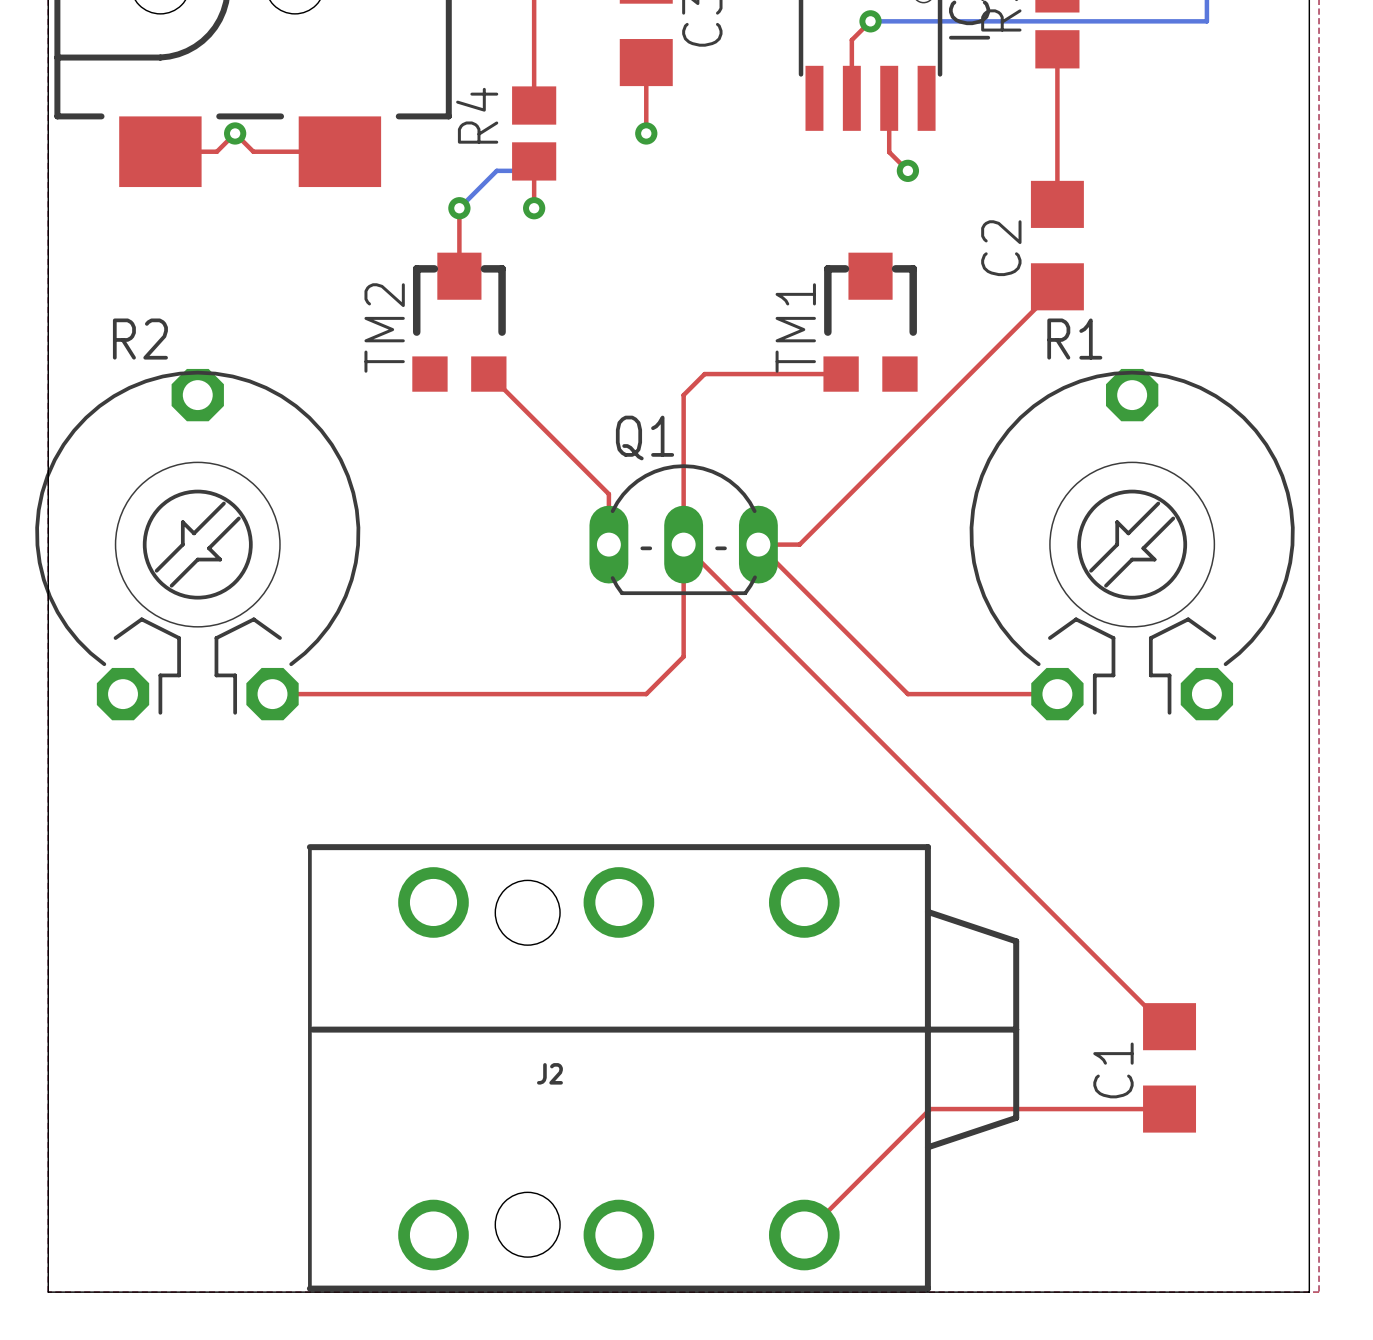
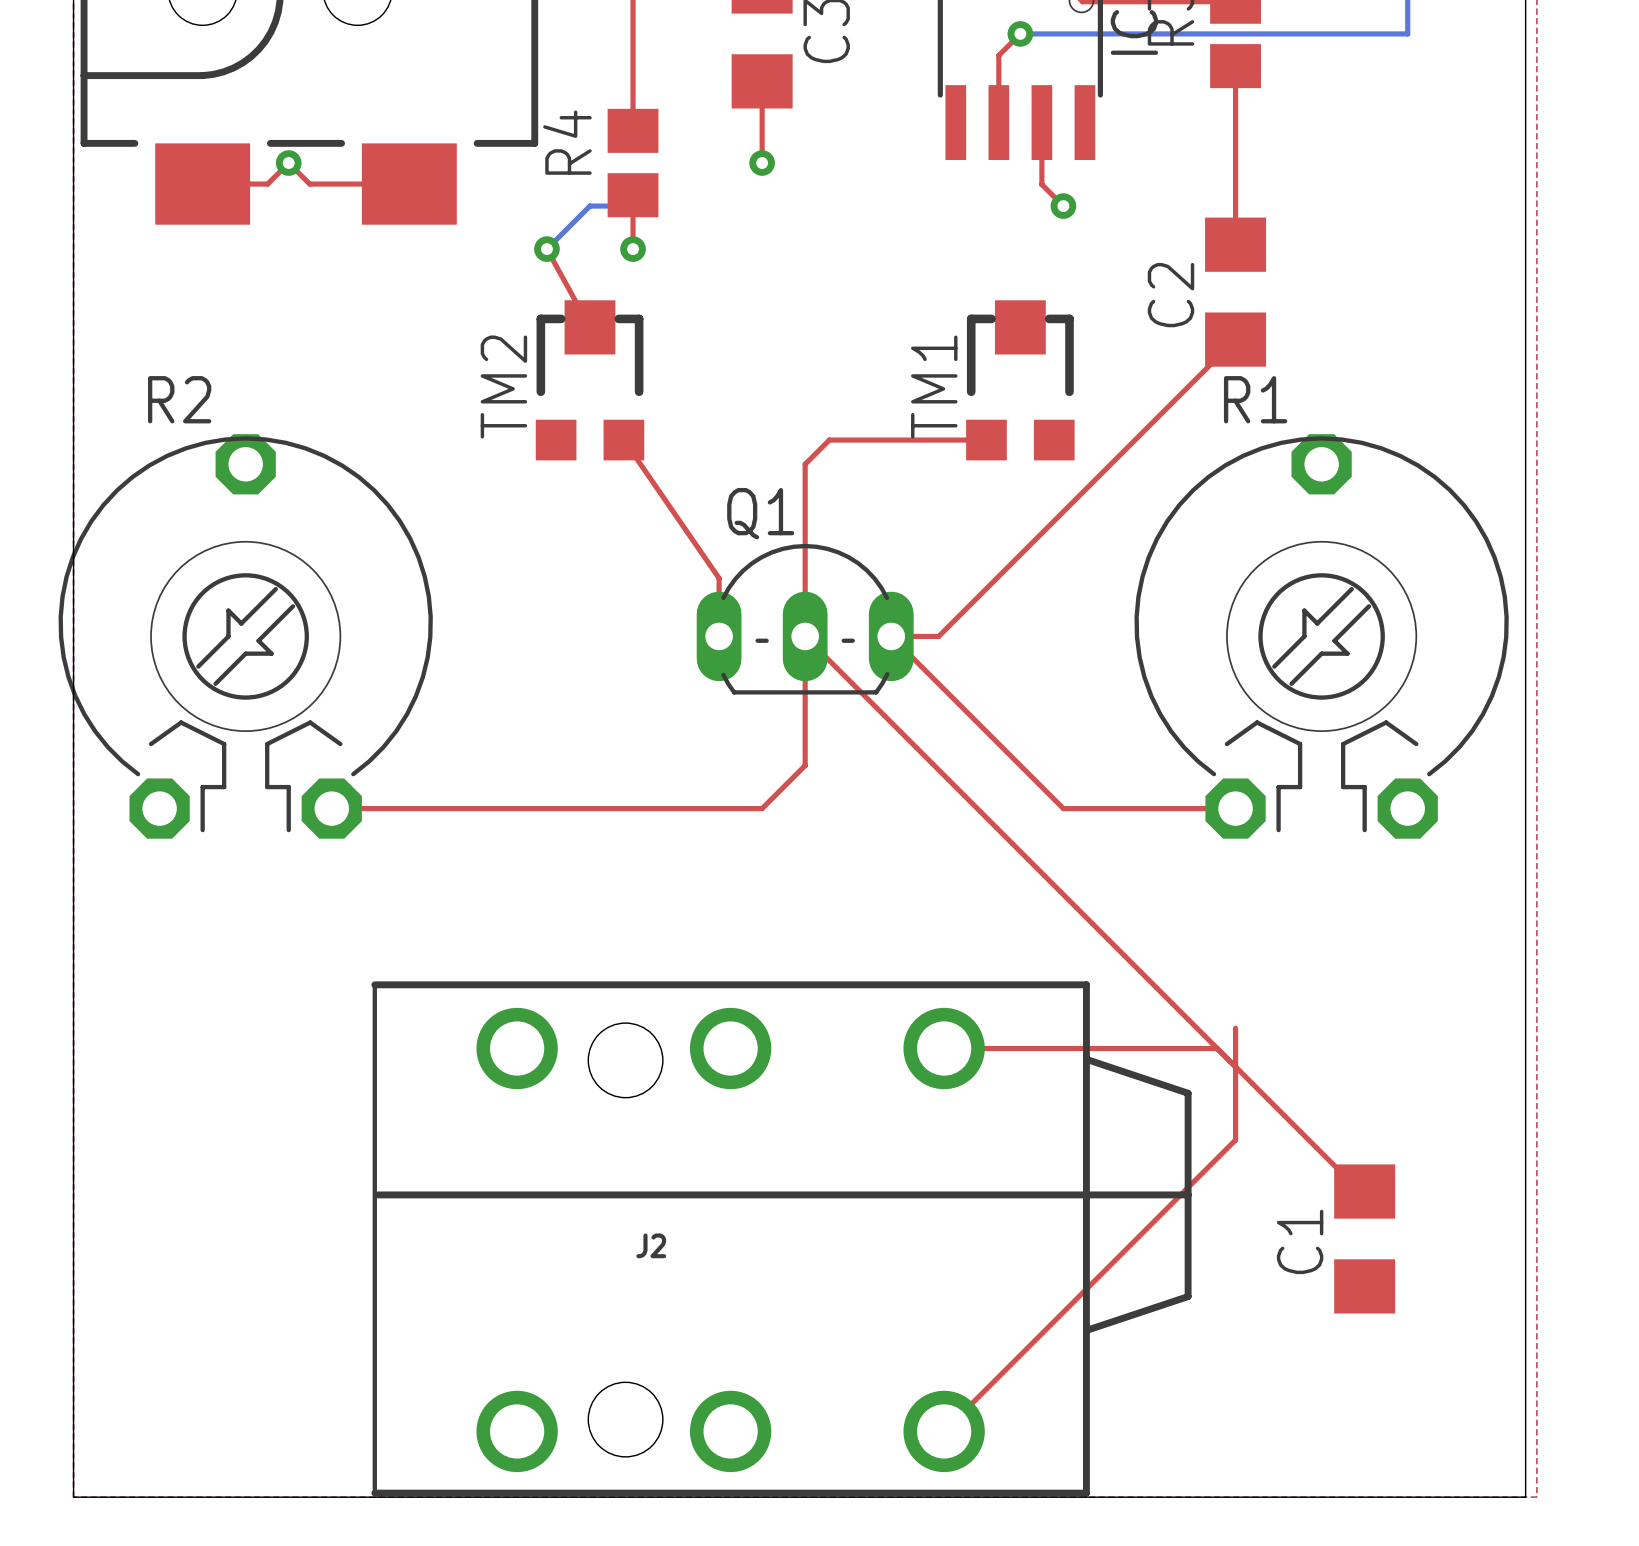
top track: (459, 208) (459, 276) -> (546, 249) (589, 327)
TM2 position: (459, 322) -> (589, 380)
top track: (488, 374) (608, 494) -> (623, 440) (719, 578)
top track: none -> (944, 1048) (1217, 1048)
top track: (930, 1109) (1169, 1109) -> (1089, 1286) (1235, 1140) (1235, 1028)

